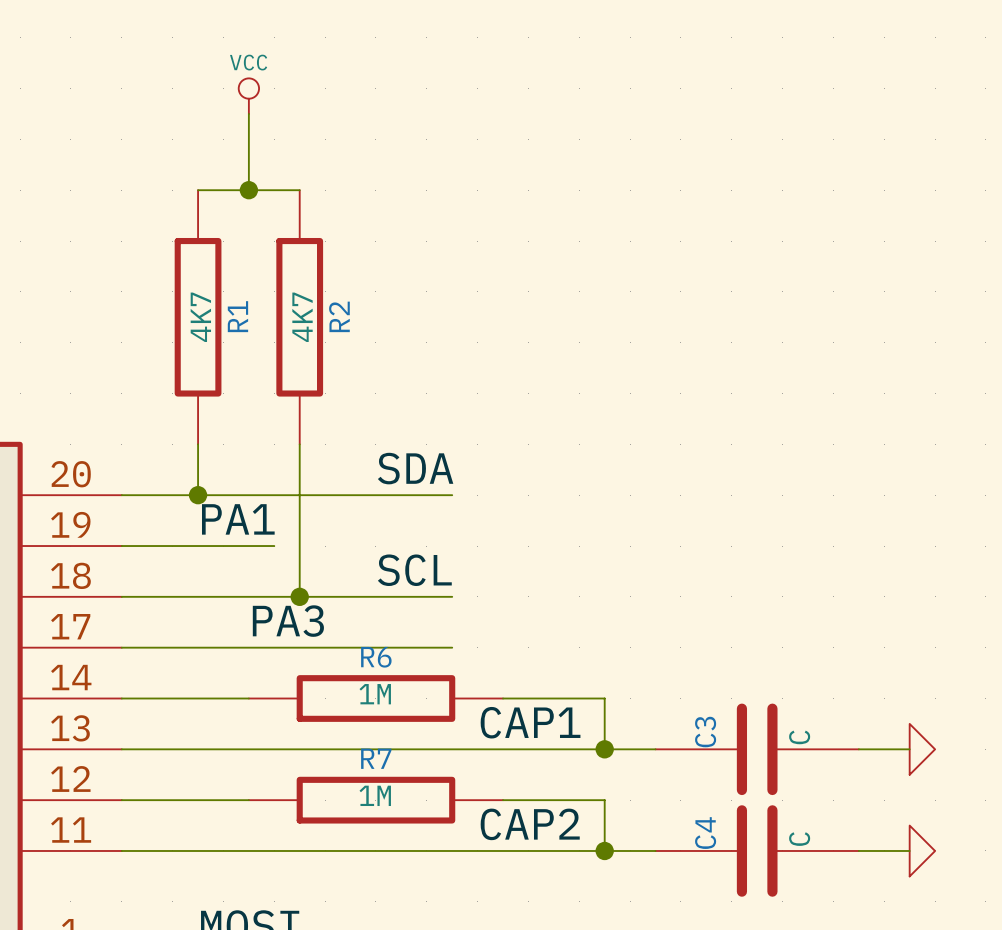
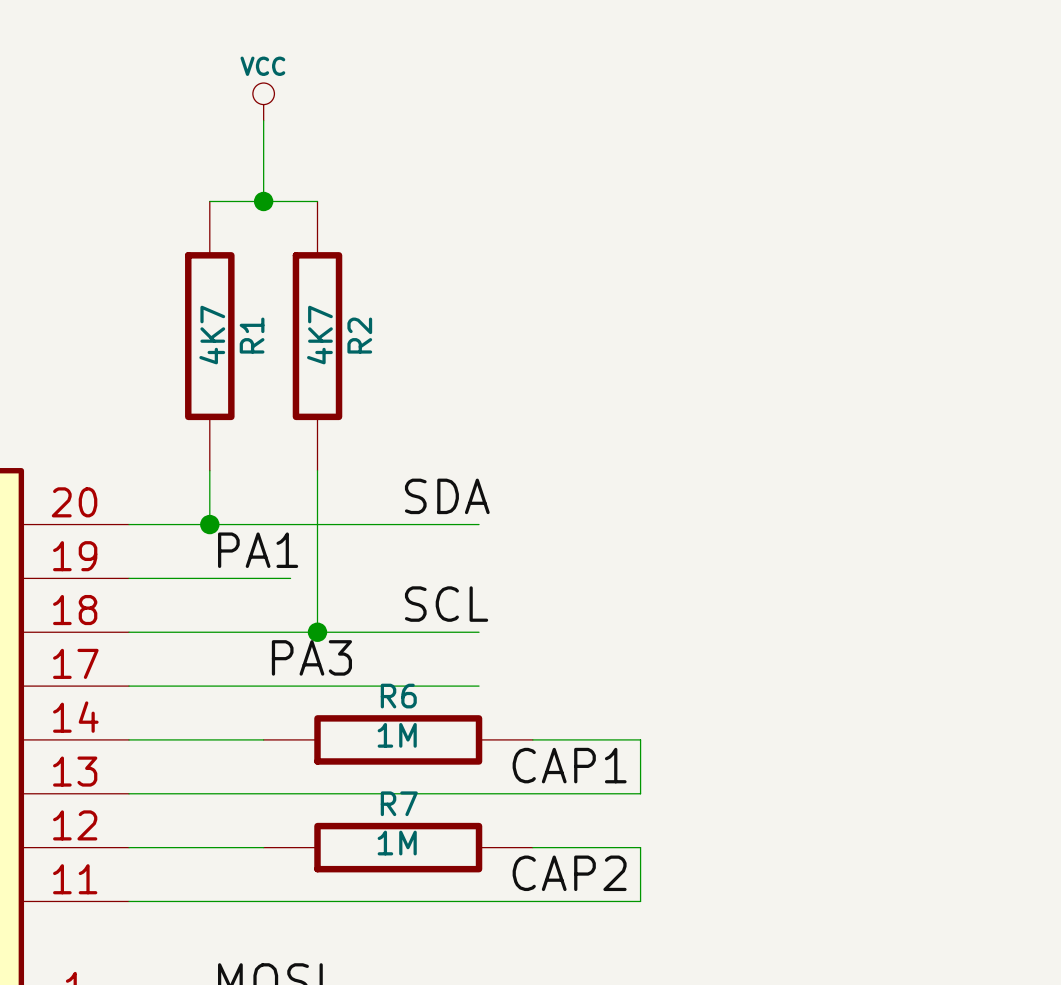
wire: (604, 749) (655, 749) -> none
junction: (604, 749) -> none
C3: C (757, 749) -> none
wire: (858, 749) (909, 749) -> none
power symbol: (922, 749) -> none
wire: (604, 850) (655, 850) -> none
junction: (604, 850) -> none
C4: C (757, 850) -> none
wire: (858, 850) (909, 850) -> none
power symbol: (922, 850) -> none

